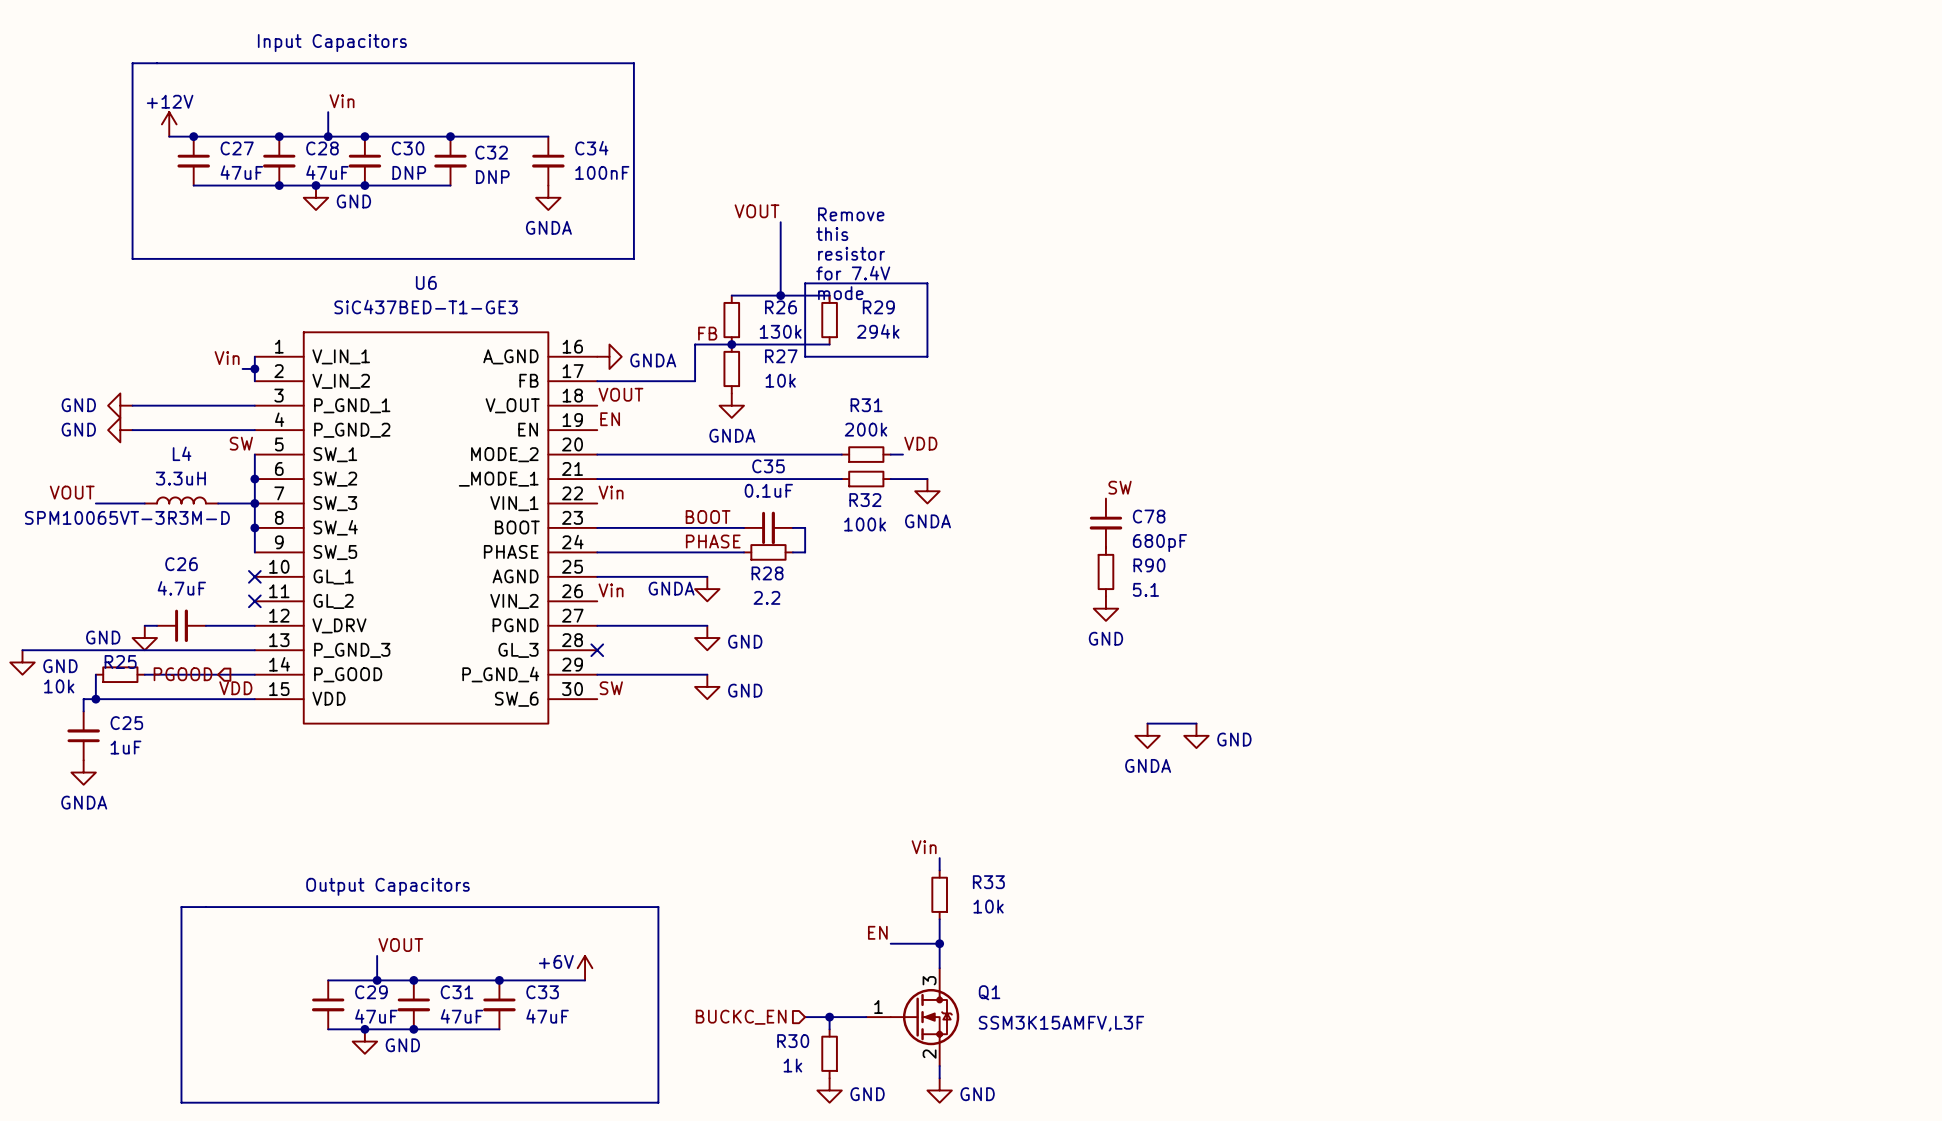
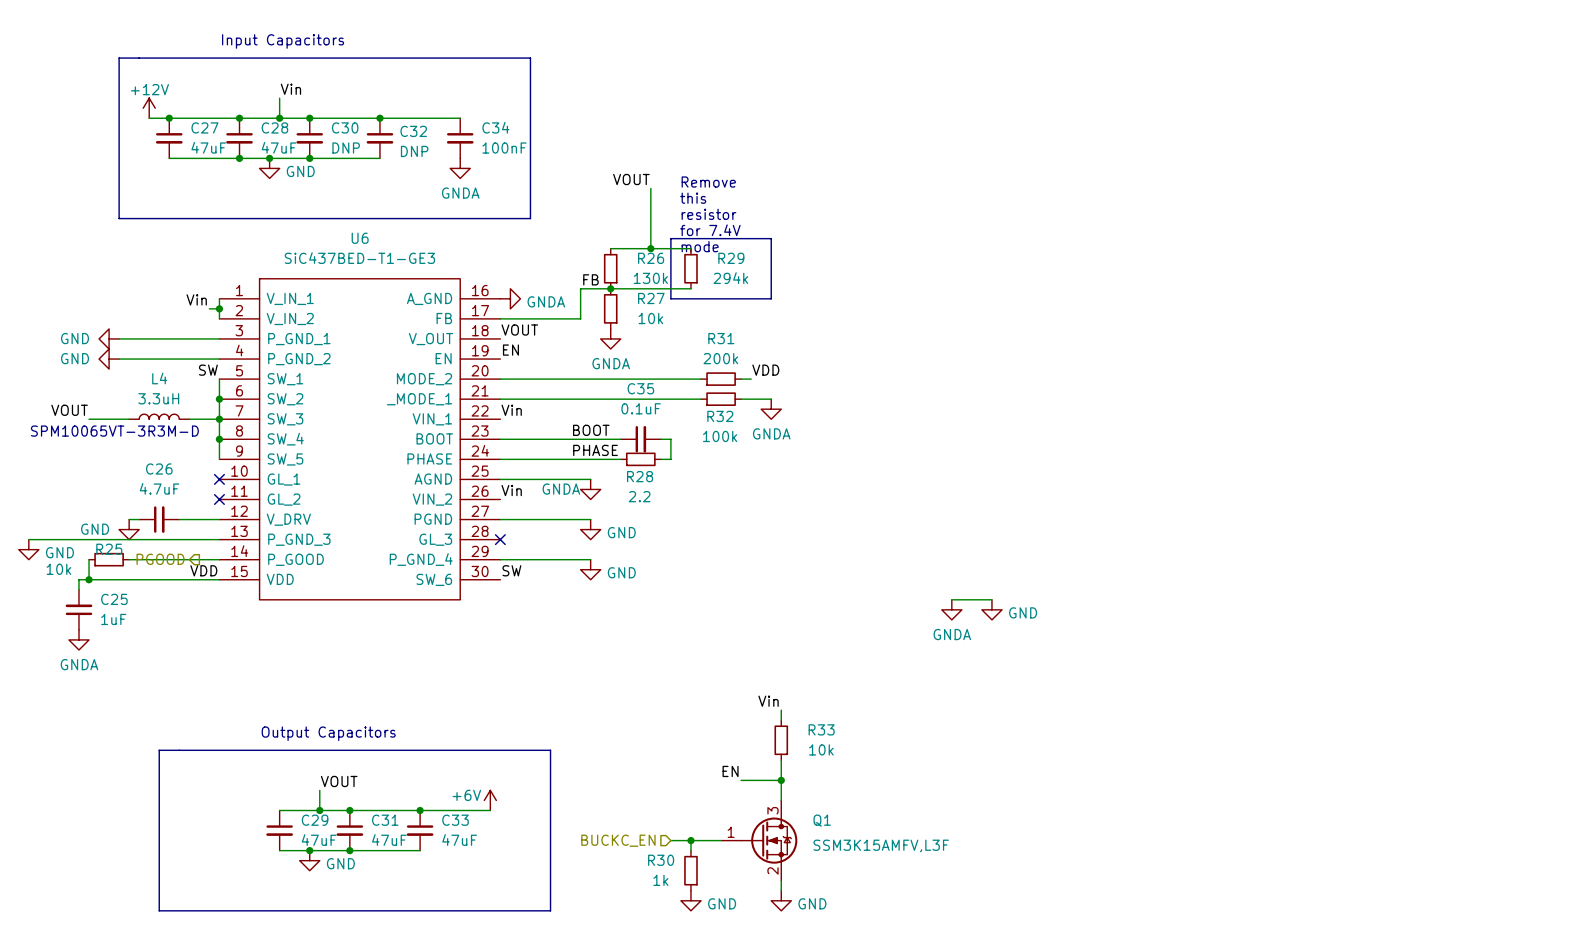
label: SW (1120, 487) -> none
C78: 680pF (1105, 523) -> none
R90: 5.1 (1105, 571) -> none
power symbol: GND (1105, 608) -> none

